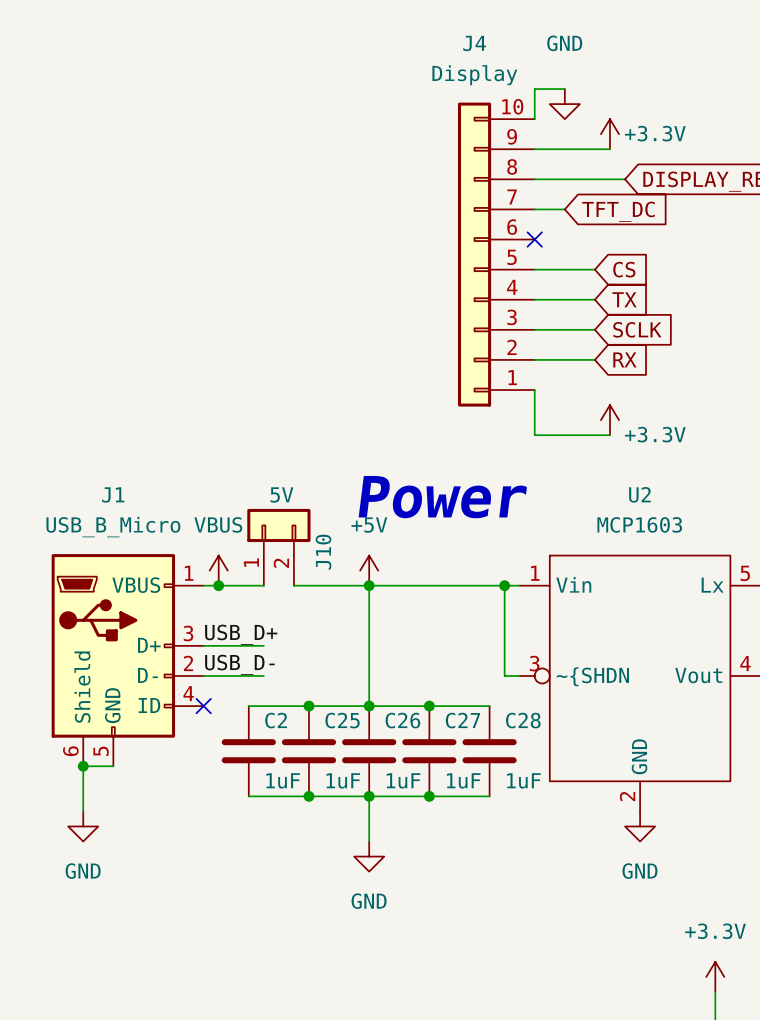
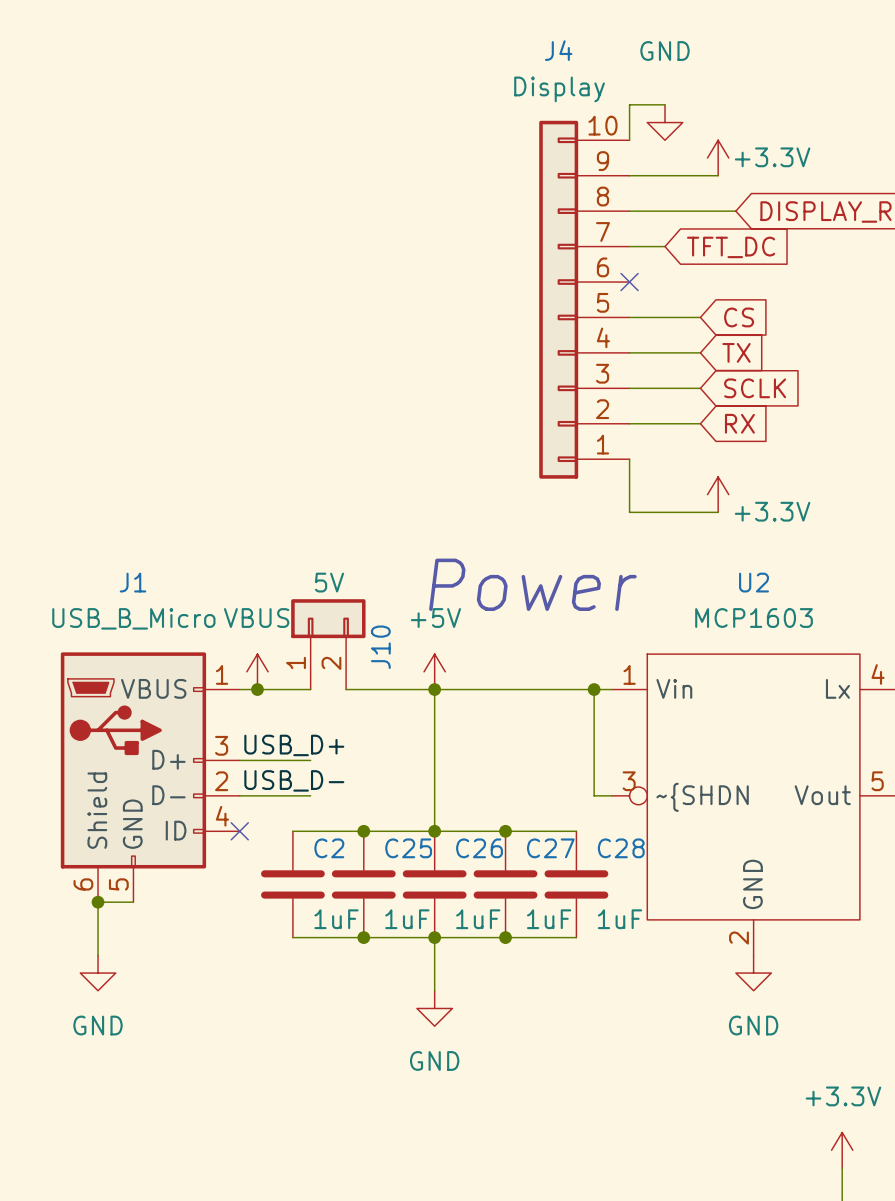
U2 pin number: 5 (745, 573) -> 4 (878, 674)
U2 pin number: 4 (745, 663) -> 5 (877, 781)

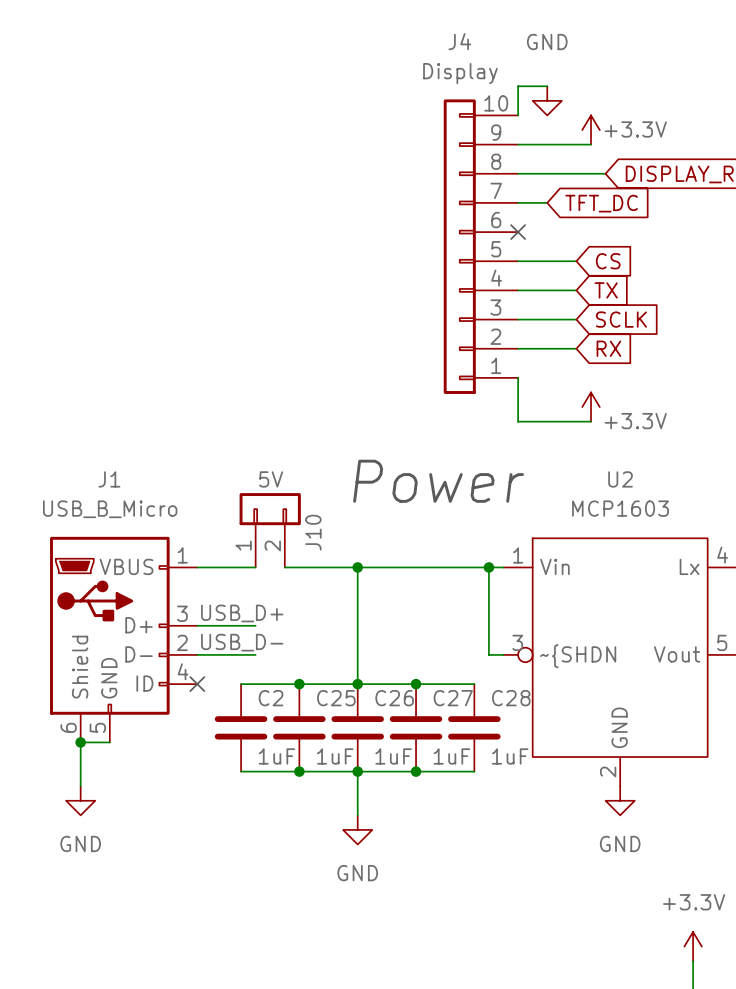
power symbol: VBUS (257, 671) -> none
power symbol: +5V (434, 671) -> none
junction: (257, 689) -> none

